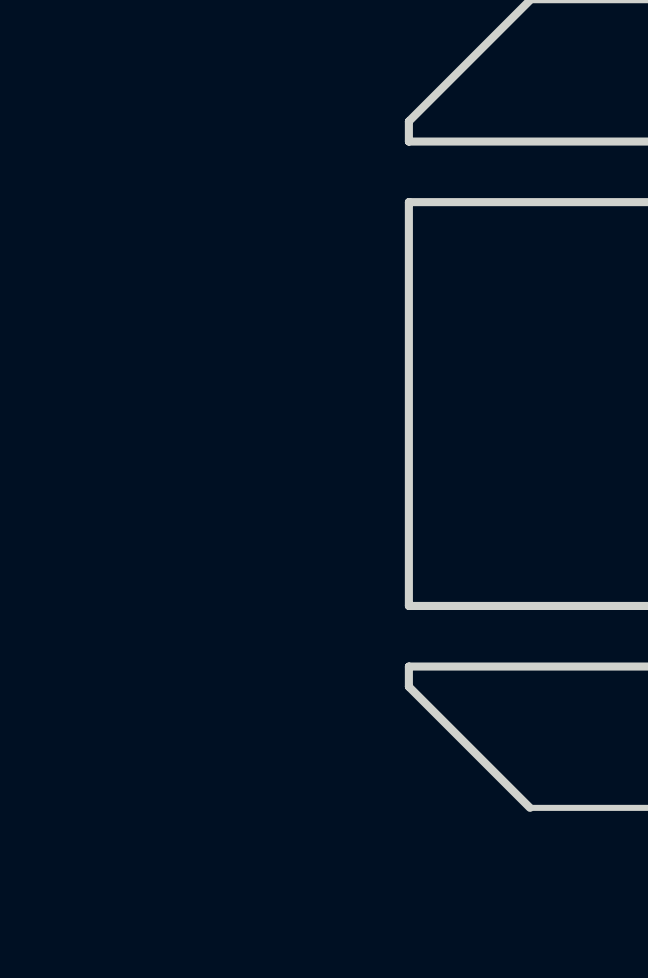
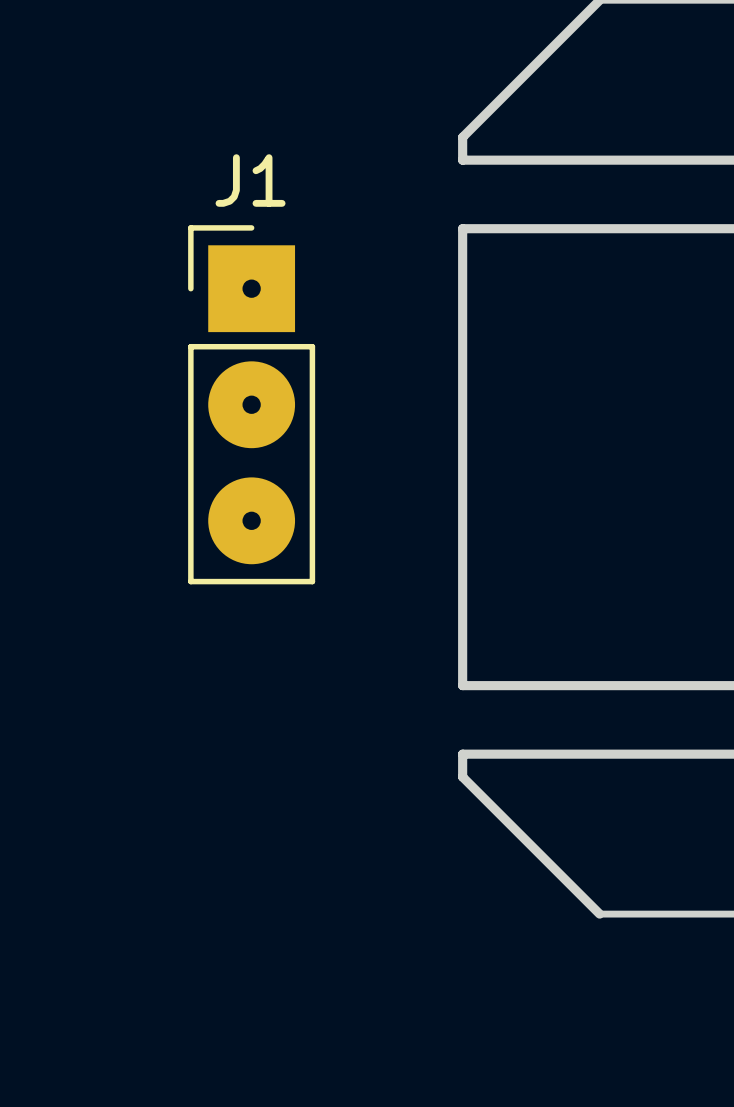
J1: none -> (251, 404)

